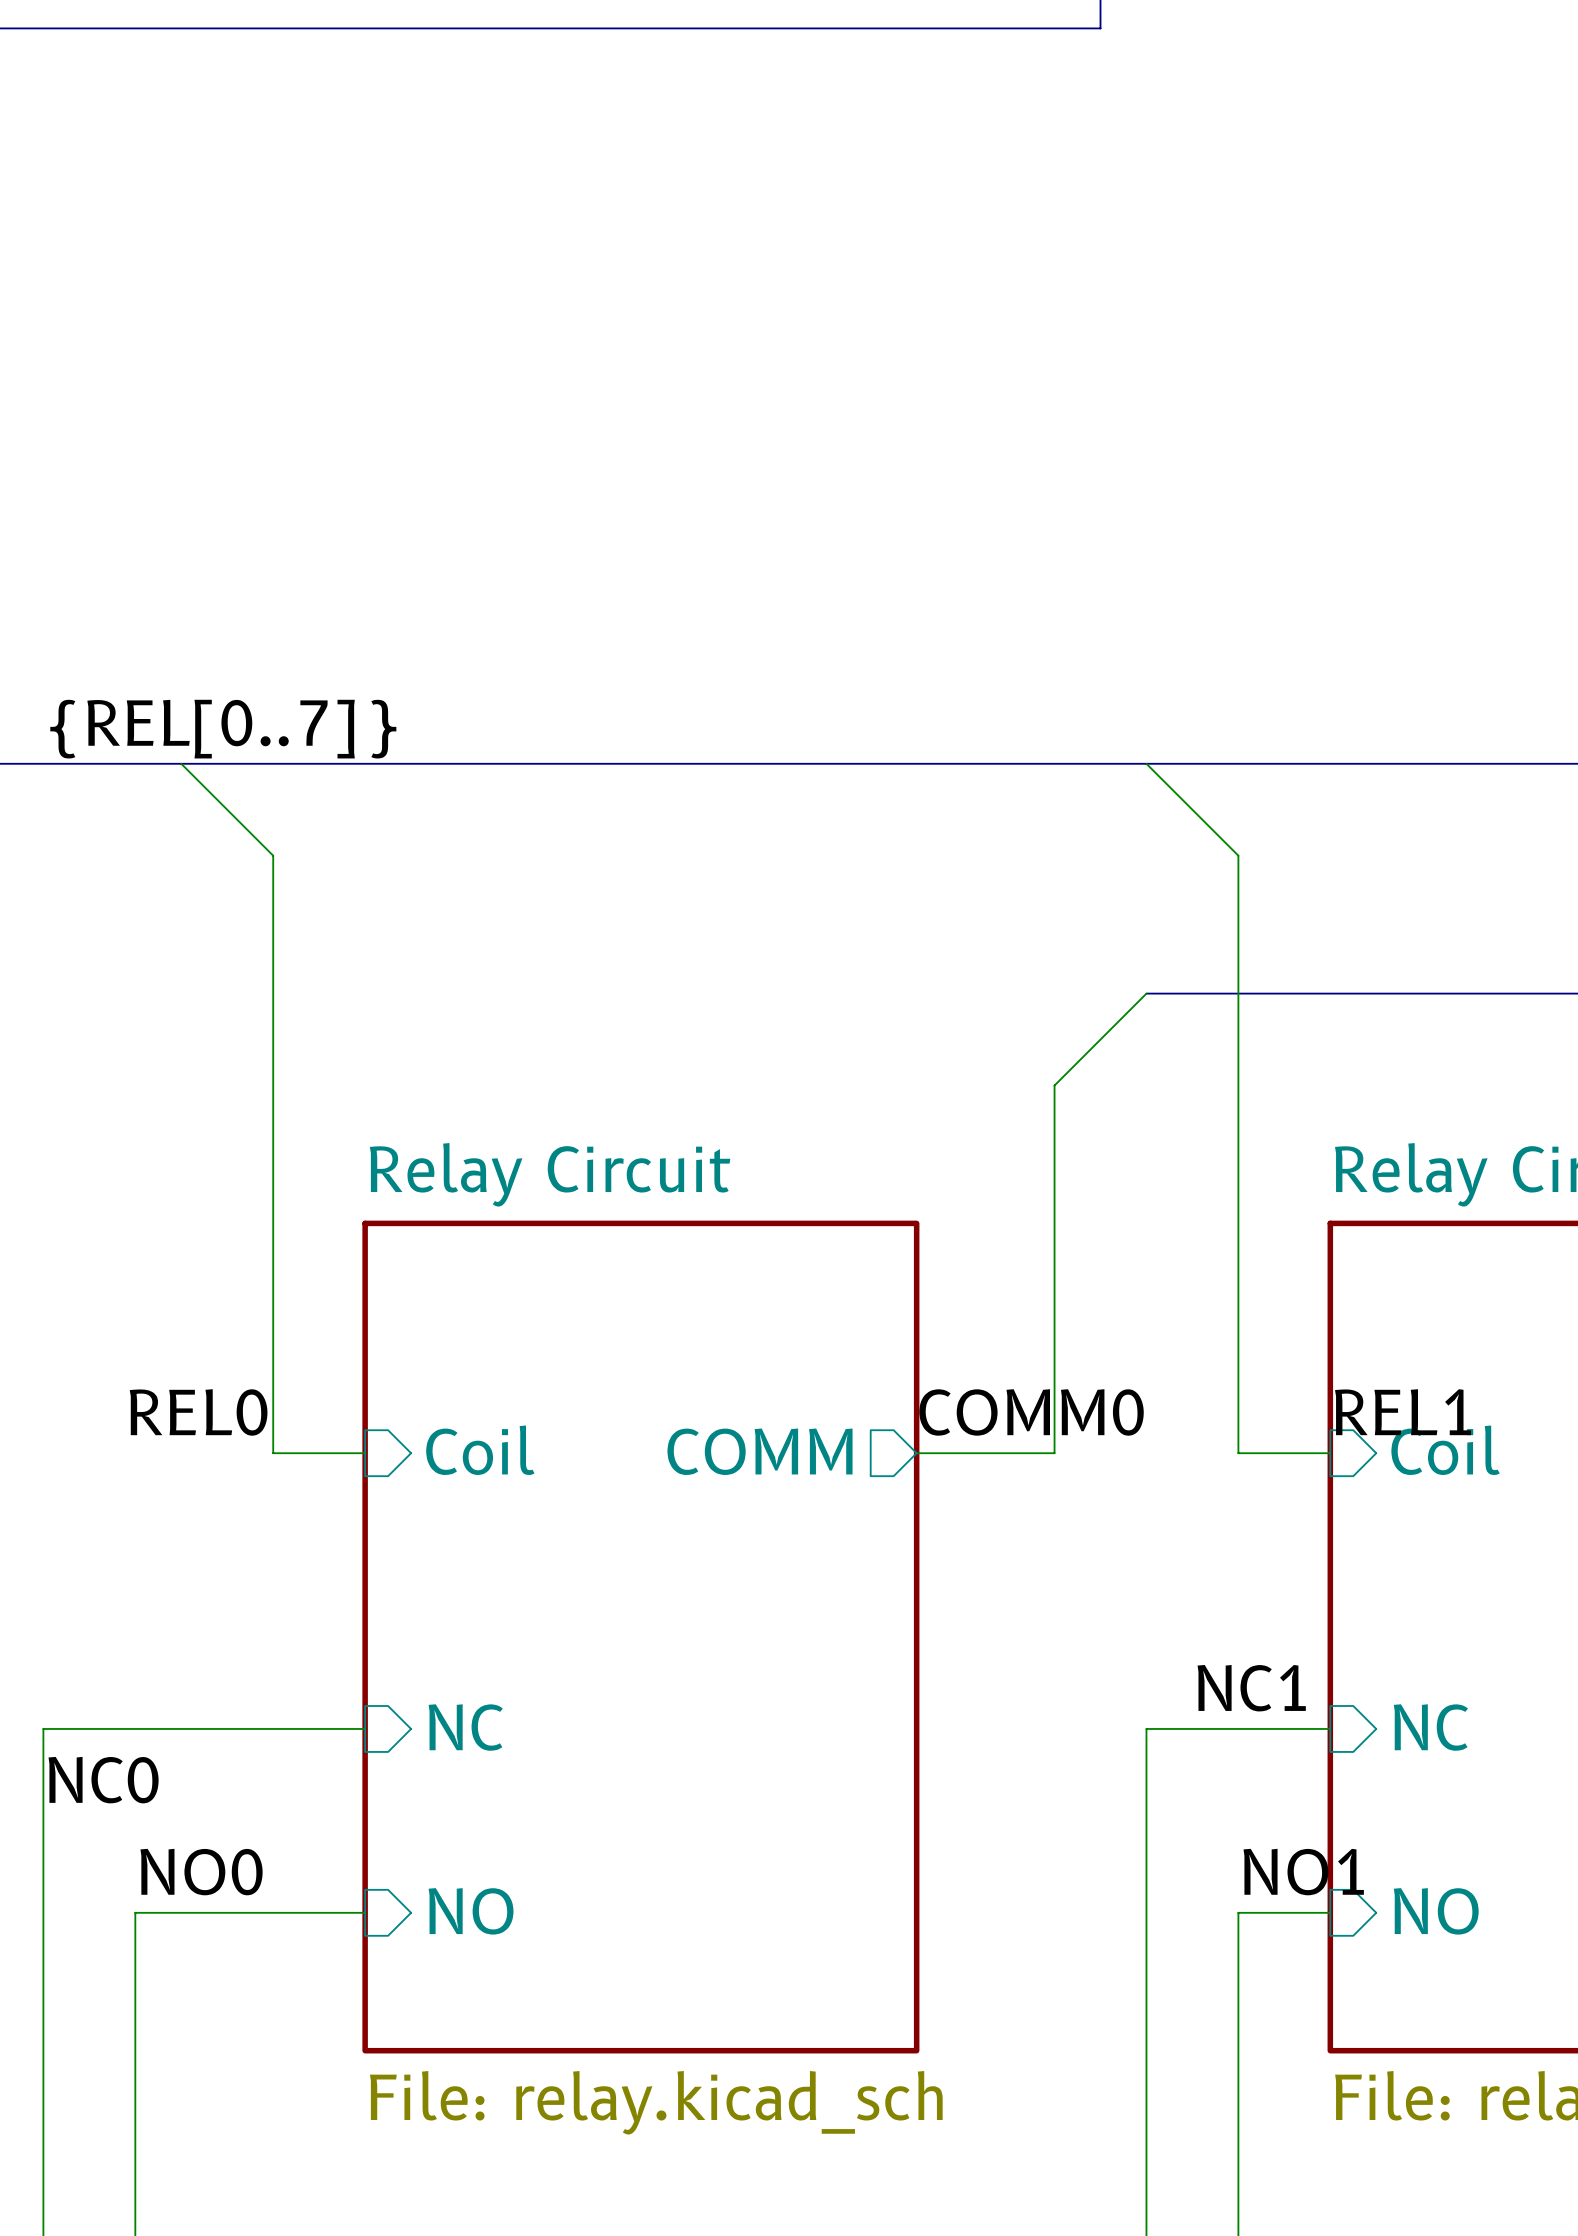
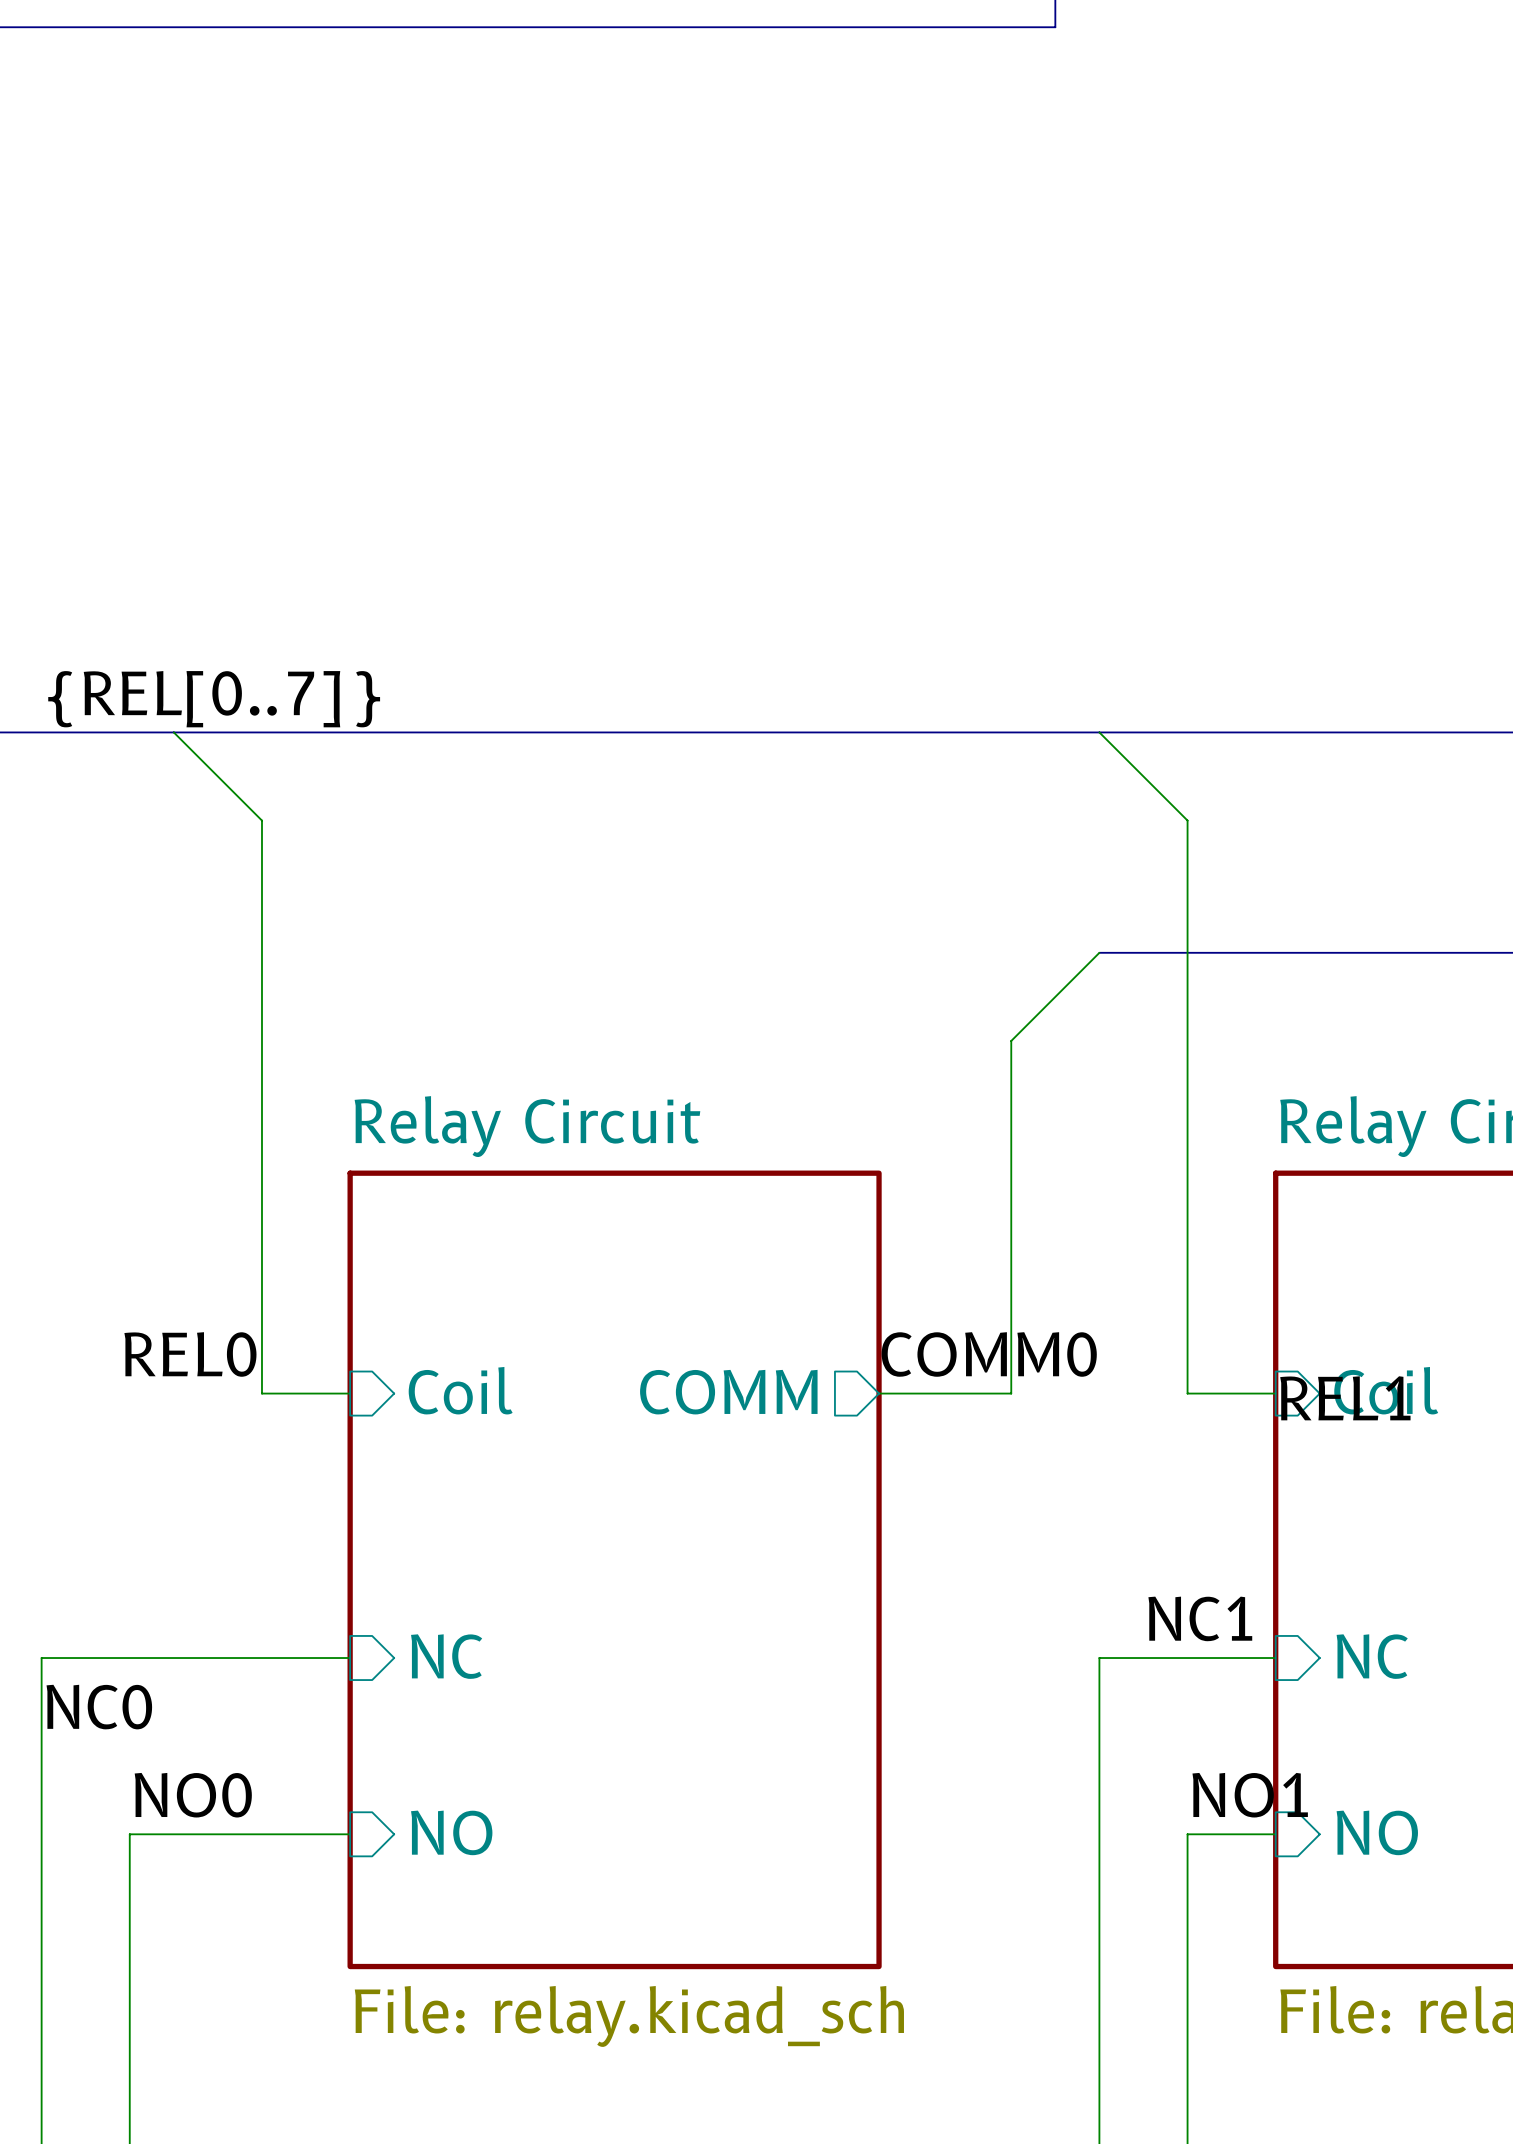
label position: REL1 (1402, 1412) -> REL1 (1345, 1398)

